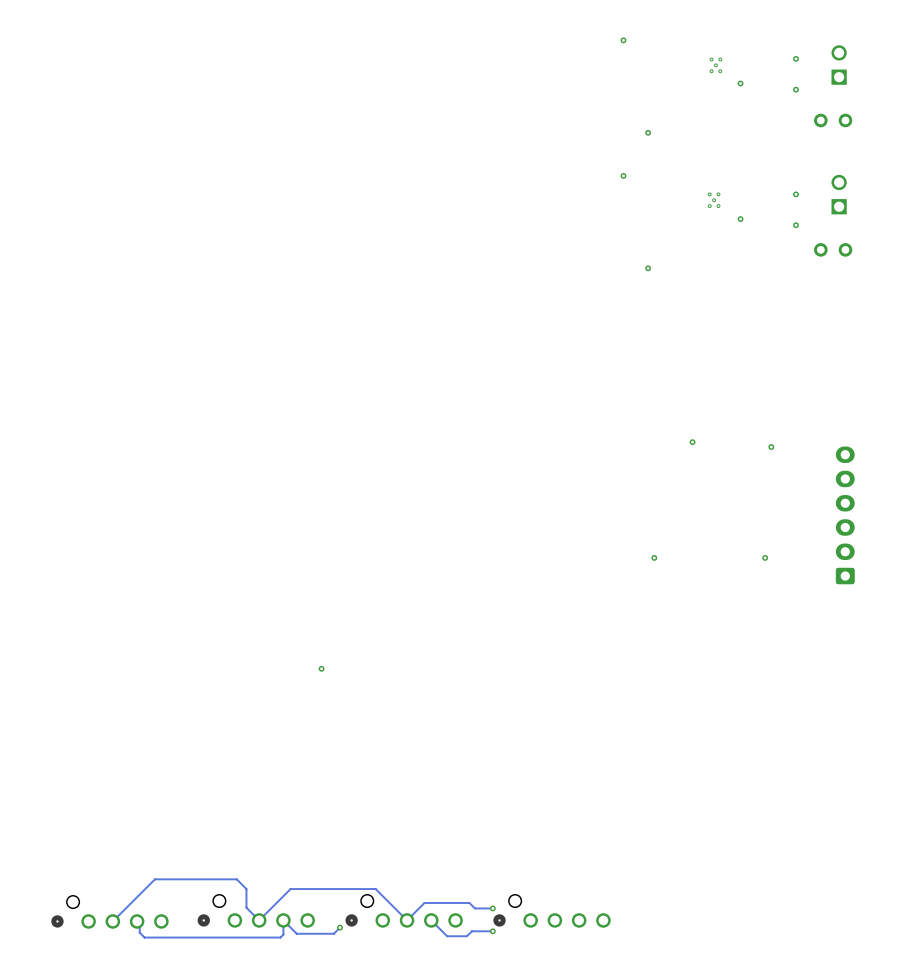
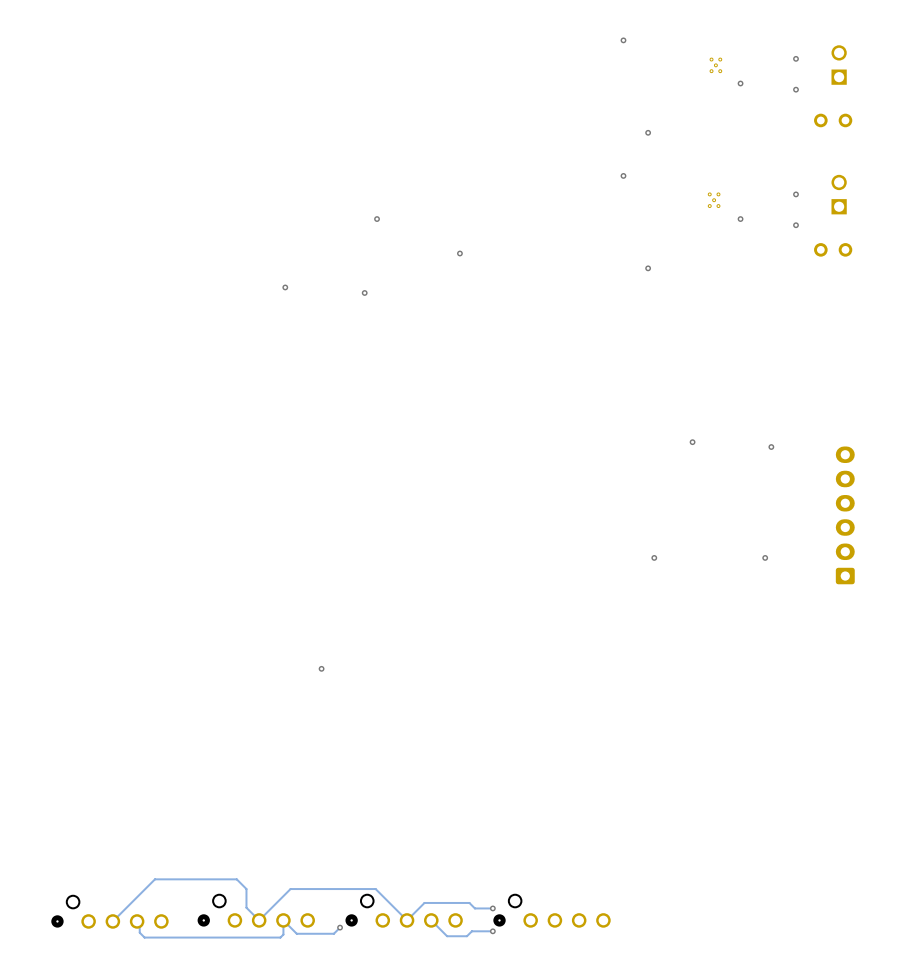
via: none -> (377, 219)
via: none -> (459, 253)
via: none -> (285, 287)
via: none -> (364, 292)

